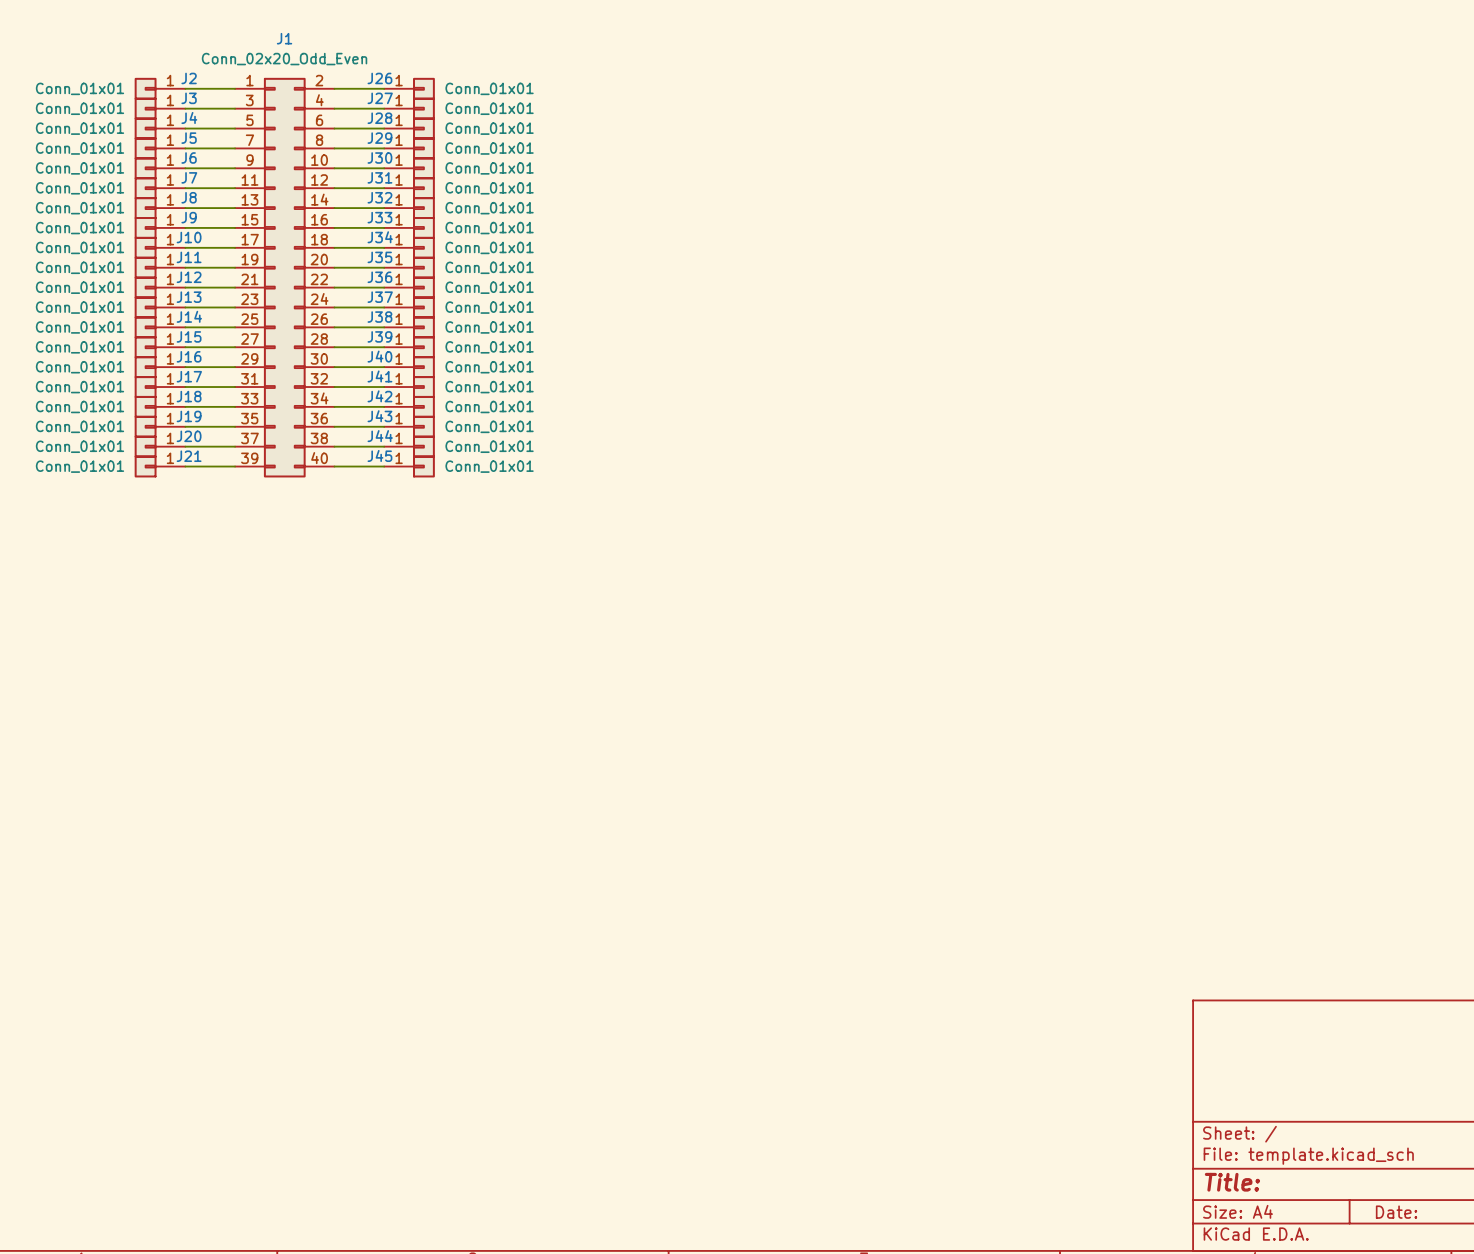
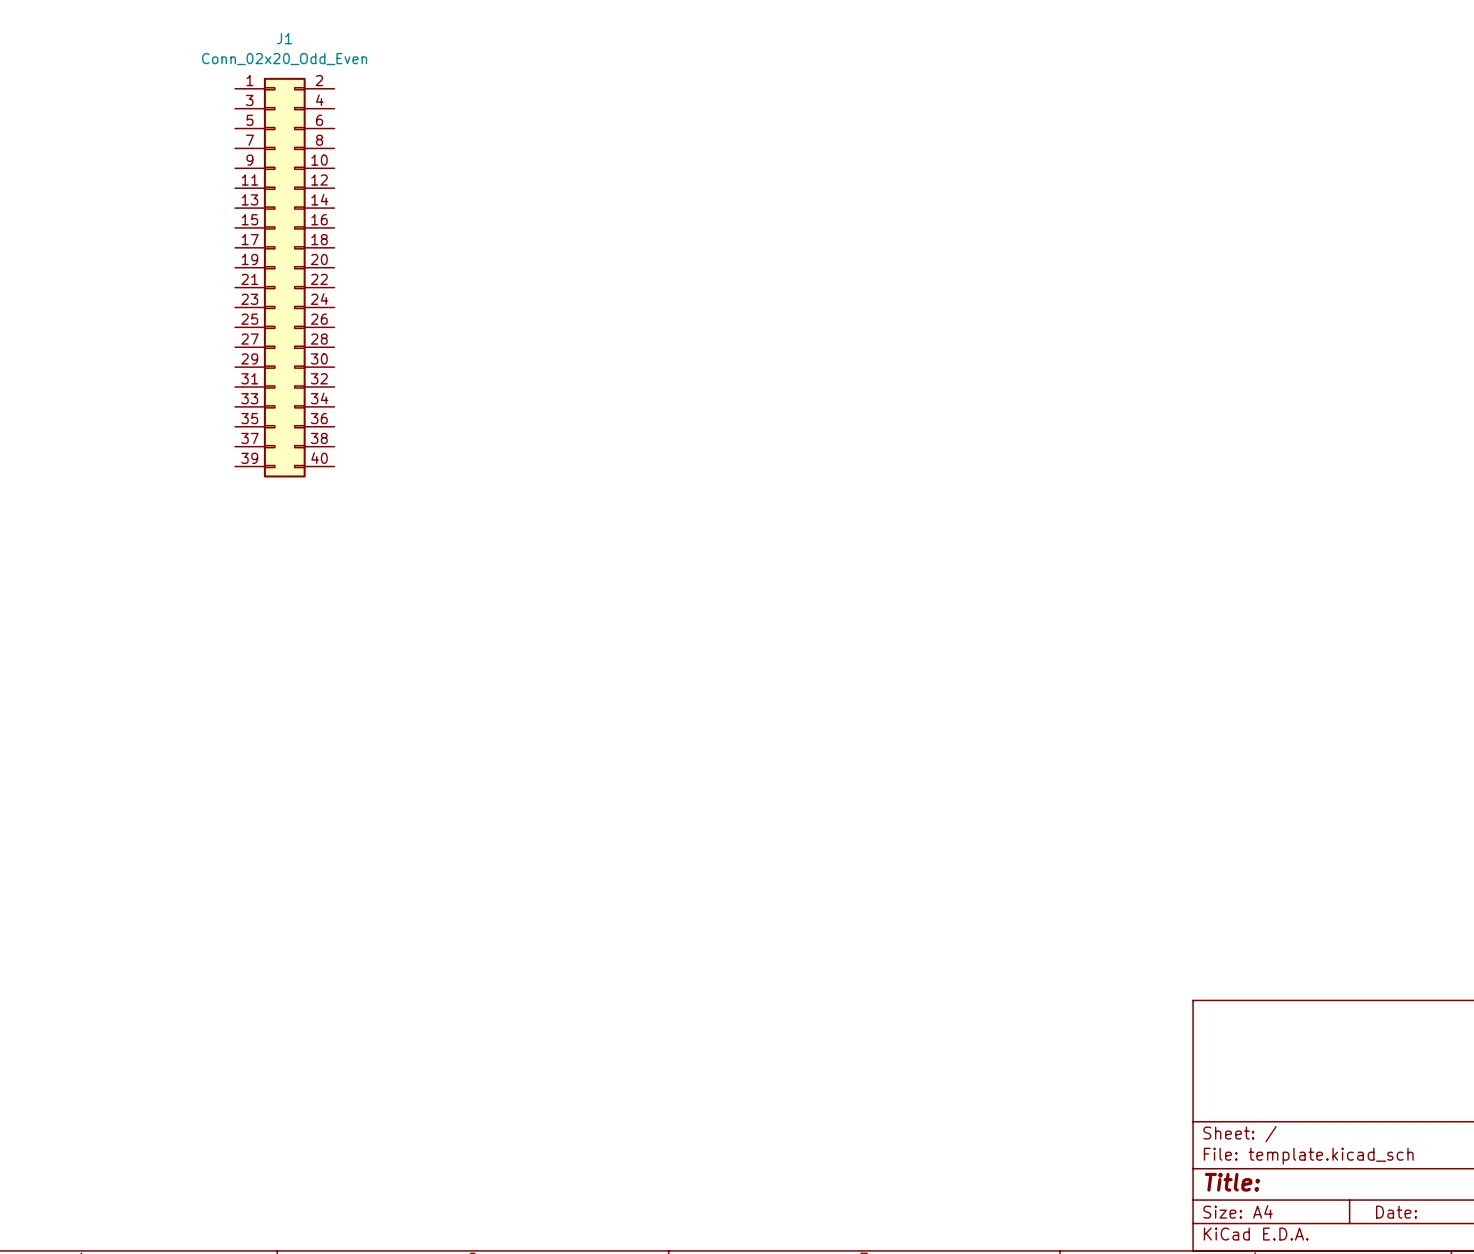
J2: Conn_01x01 (160, 88) -> none
wire: (185, 88) (235, 88) -> none
wire: (334, 88) (384, 88) -> none
J26: Conn_01x01 (409, 88) -> none
J3: Conn_01x01 (160, 108) -> none
wire: (185, 108) (235, 108) -> none
wire: (334, 108) (384, 108) -> none
J27: Conn_01x01 (409, 108) -> none
J4: Conn_01x01 (160, 128) -> none
wire: (185, 128) (235, 128) -> none
wire: (334, 128) (384, 128) -> none
J28: Conn_01x01 (409, 128) -> none
J5: Conn_01x01 (160, 148) -> none
wire: (185, 148) (235, 148) -> none
wire: (334, 148) (384, 148) -> none
J29: Conn_01x01 (409, 148) -> none
J6: Conn_01x01 (160, 168) -> none
wire: (185, 168) (235, 168) -> none
wire: (334, 168) (384, 168) -> none
J30: Conn_01x01 (409, 168) -> none
J7: Conn_01x01 (160, 188) -> none
wire: (185, 188) (235, 188) -> none
wire: (334, 188) (384, 188) -> none
J31: Conn_01x01 (409, 188) -> none
J8: Conn_01x01 (160, 208) -> none
wire: (185, 208) (235, 208) -> none
wire: (334, 208) (384, 208) -> none
J32: Conn_01x01 (409, 208) -> none
J9: Conn_01x01 (160, 227) -> none
wire: (185, 227) (235, 227) -> none
wire: (334, 227) (384, 227) -> none
J33: Conn_01x01 (409, 227) -> none
J10: Conn_01x01 (160, 247) -> none
wire: (185, 247) (235, 247) -> none
wire: (334, 247) (384, 247) -> none
J34: Conn_01x01 (409, 247) -> none
J11: Conn_01x01 (160, 267) -> none
wire: (185, 267) (235, 267) -> none
wire: (334, 267) (384, 267) -> none
J35: Conn_01x01 (409, 267) -> none
J12: Conn_01x01 (160, 287) -> none
wire: (185, 287) (235, 287) -> none
wire: (334, 287) (384, 287) -> none
J36: Conn_01x01 (409, 287) -> none
J13: Conn_01x01 (160, 307) -> none
wire: (185, 307) (235, 307) -> none
wire: (334, 307) (384, 307) -> none
J37: Conn_01x01 (409, 307) -> none
J14: Conn_01x01 (160, 327) -> none
wire: (185, 327) (235, 327) -> none
wire: (334, 327) (384, 327) -> none
J38: Conn_01x01 (409, 327) -> none
J15: Conn_01x01 (160, 347) -> none
wire: (185, 347) (235, 347) -> none
wire: (334, 347) (384, 347) -> none
J39: Conn_01x01 (409, 347) -> none
J16: Conn_01x01 (160, 367) -> none
wire: (185, 367) (235, 367) -> none
wire: (334, 367) (384, 367) -> none
J40: Conn_01x01 (409, 367) -> none
J17: Conn_01x01 (160, 387) -> none
wire: (185, 387) (235, 387) -> none
wire: (334, 387) (384, 387) -> none
J41: Conn_01x01 (409, 387) -> none
J18: Conn_01x01 (160, 406) -> none
wire: (185, 406) (235, 406) -> none
wire: (334, 406) (384, 406) -> none
J42: Conn_01x01 (409, 406) -> none
J19: Conn_01x01 (160, 426) -> none
wire: (185, 426) (235, 426) -> none
wire: (334, 426) (384, 426) -> none
J43: Conn_01x01 (409, 426) -> none
J20: Conn_01x01 (160, 446) -> none
wire: (185, 446) (235, 446) -> none
wire: (334, 446) (384, 446) -> none
J44: Conn_01x01 (409, 446) -> none
J21: Conn_01x01 (160, 466) -> none
wire: (185, 466) (235, 466) -> none
wire: (334, 466) (384, 466) -> none
J45: Conn_01x01 (409, 466) -> none

